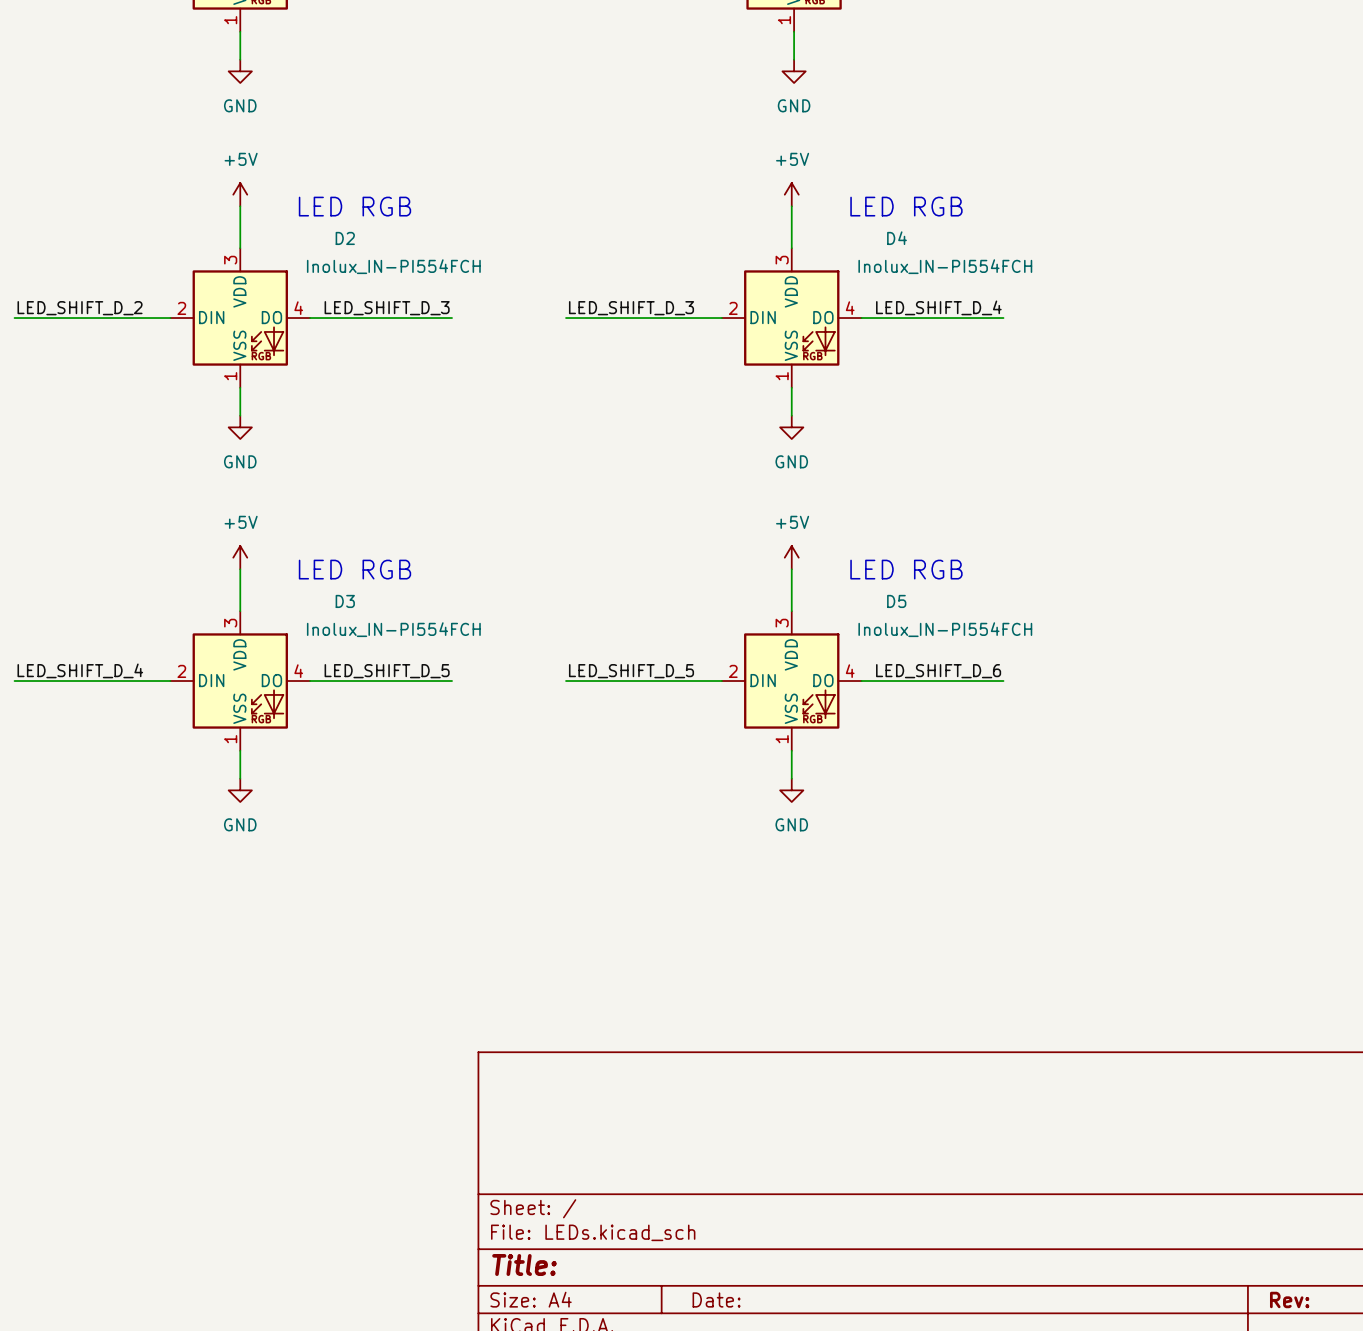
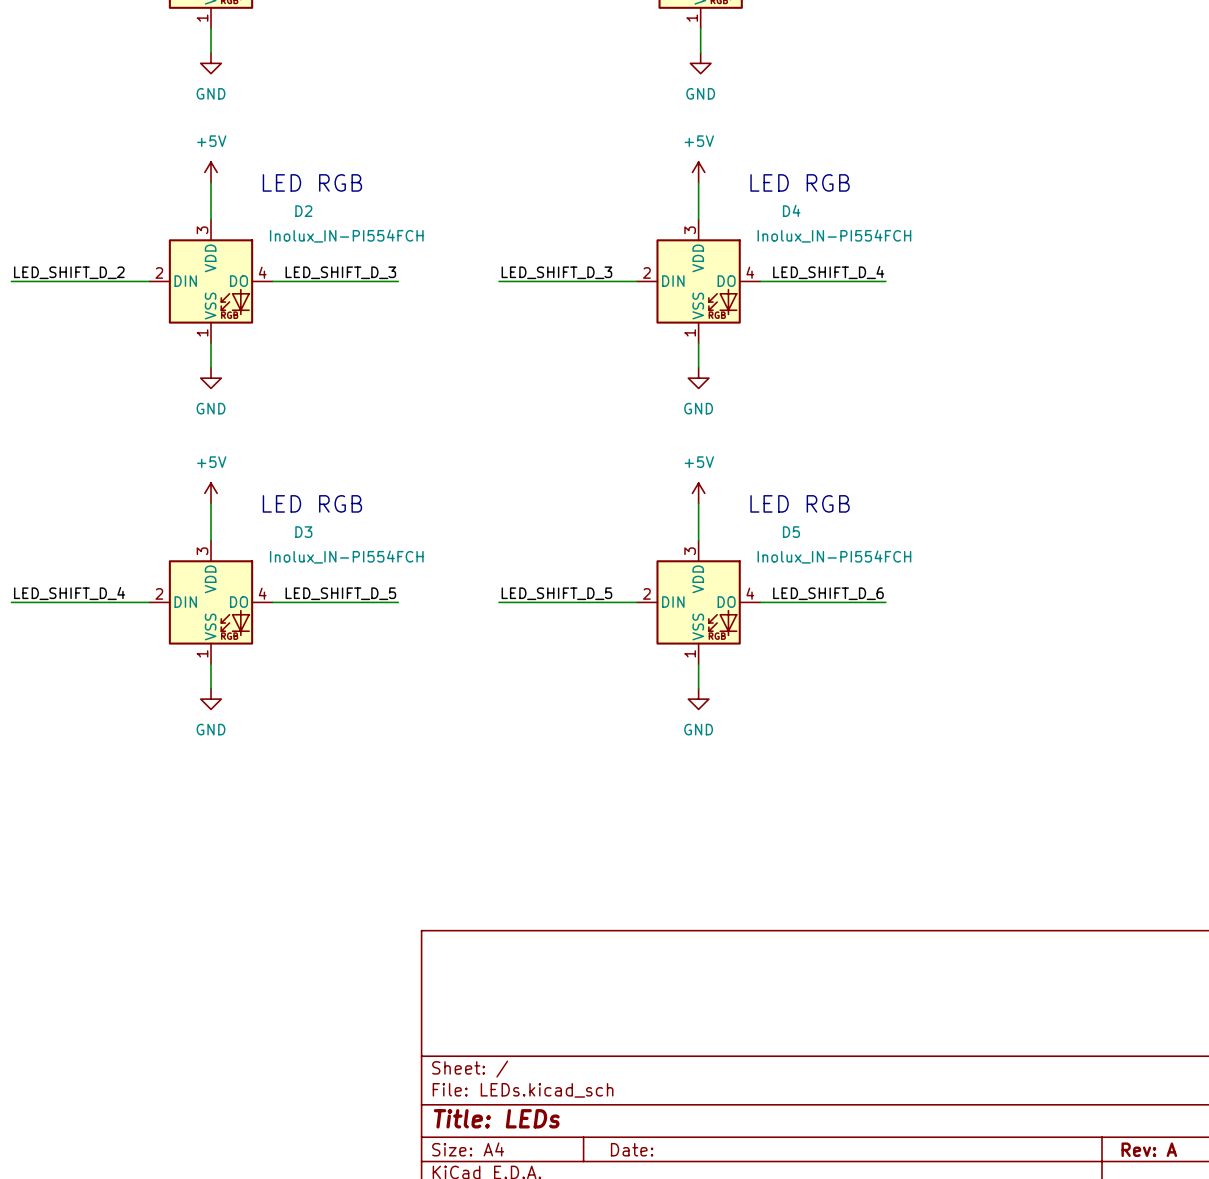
title block: Title: (524, 1265) -> Title: LEDs (496, 1118)
title block: Rev: (1289, 1299) -> Rev: A (1149, 1149)

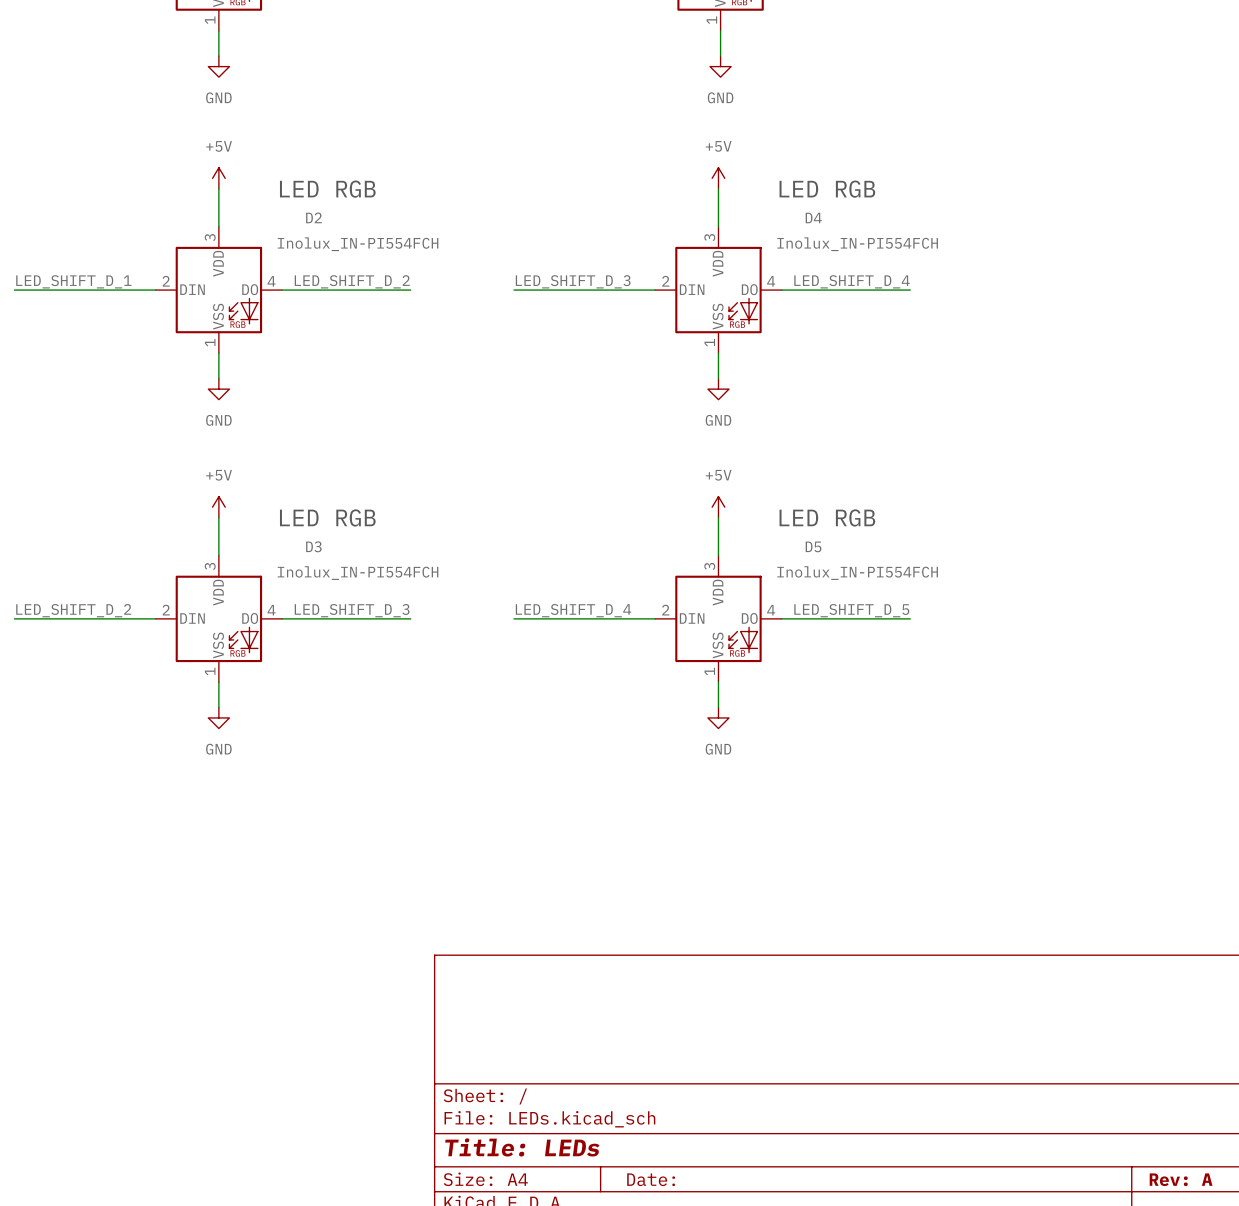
label: LED_SHIFT_D_2 (69, 272) -> LED_SHIFT_D_1 (73, 281)
label: LED_SHIFT_D_3 (340, 272) -> LED_SHIFT_D_2 (352, 281)
label: LED_SHIFT_D_4 (69, 593) -> LED_SHIFT_D_2 (73, 610)
label: LED_SHIFT_D_5 (340, 593) -> LED_SHIFT_D_3 (352, 610)
label: LED_SHIFT_D_5 (556, 593) -> LED_SHIFT_D_4 (573, 610)
label: LED_SHIFT_D_6 (828, 593) -> LED_SHIFT_D_5 (851, 610)

